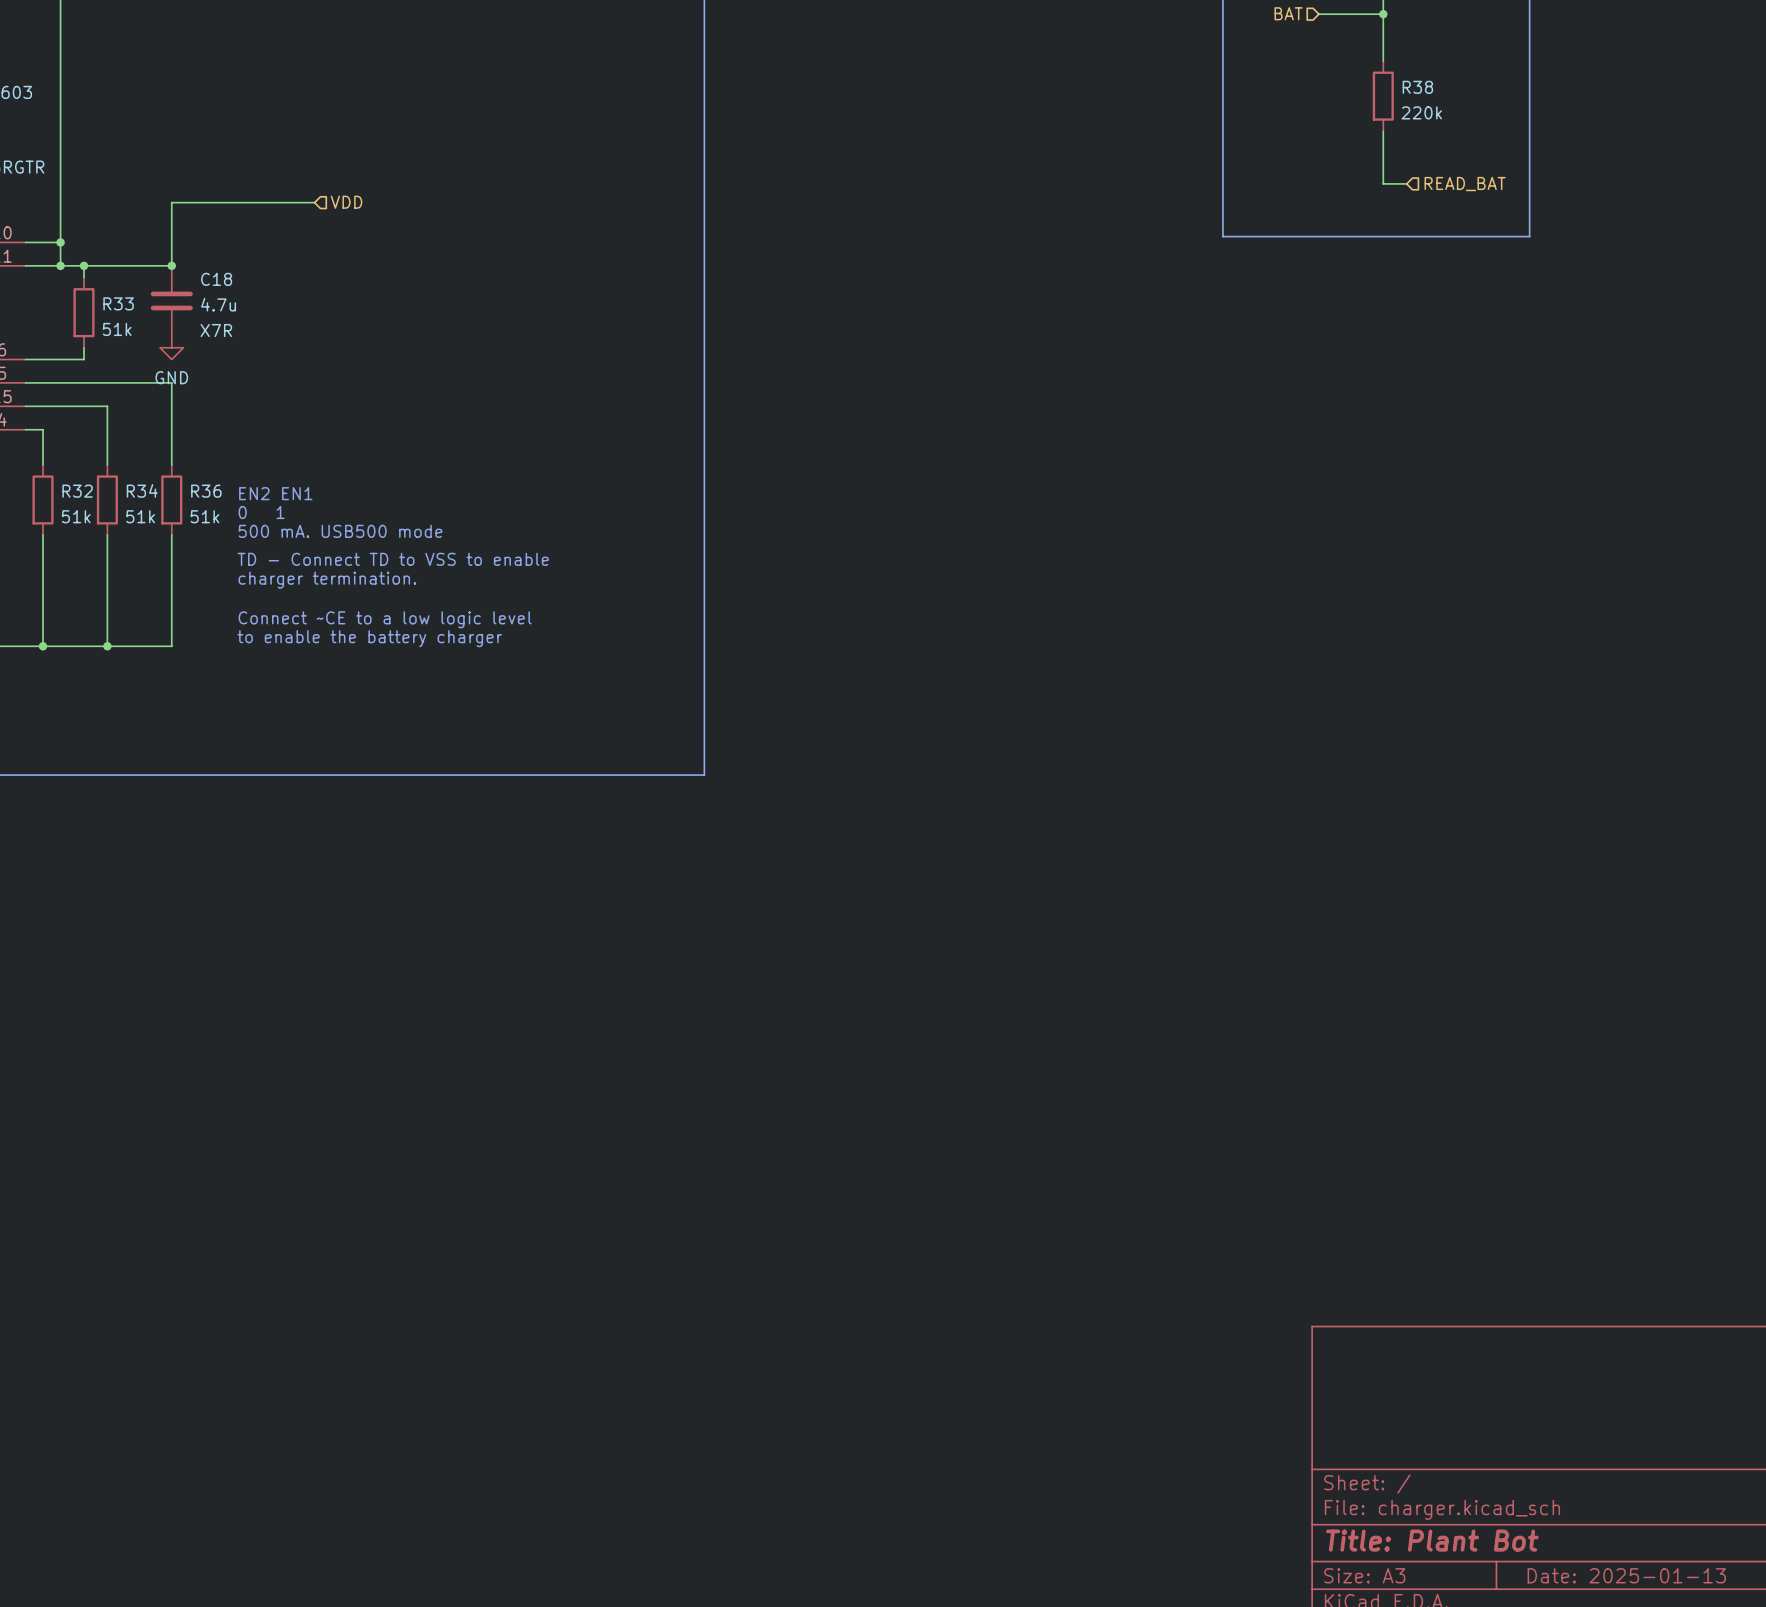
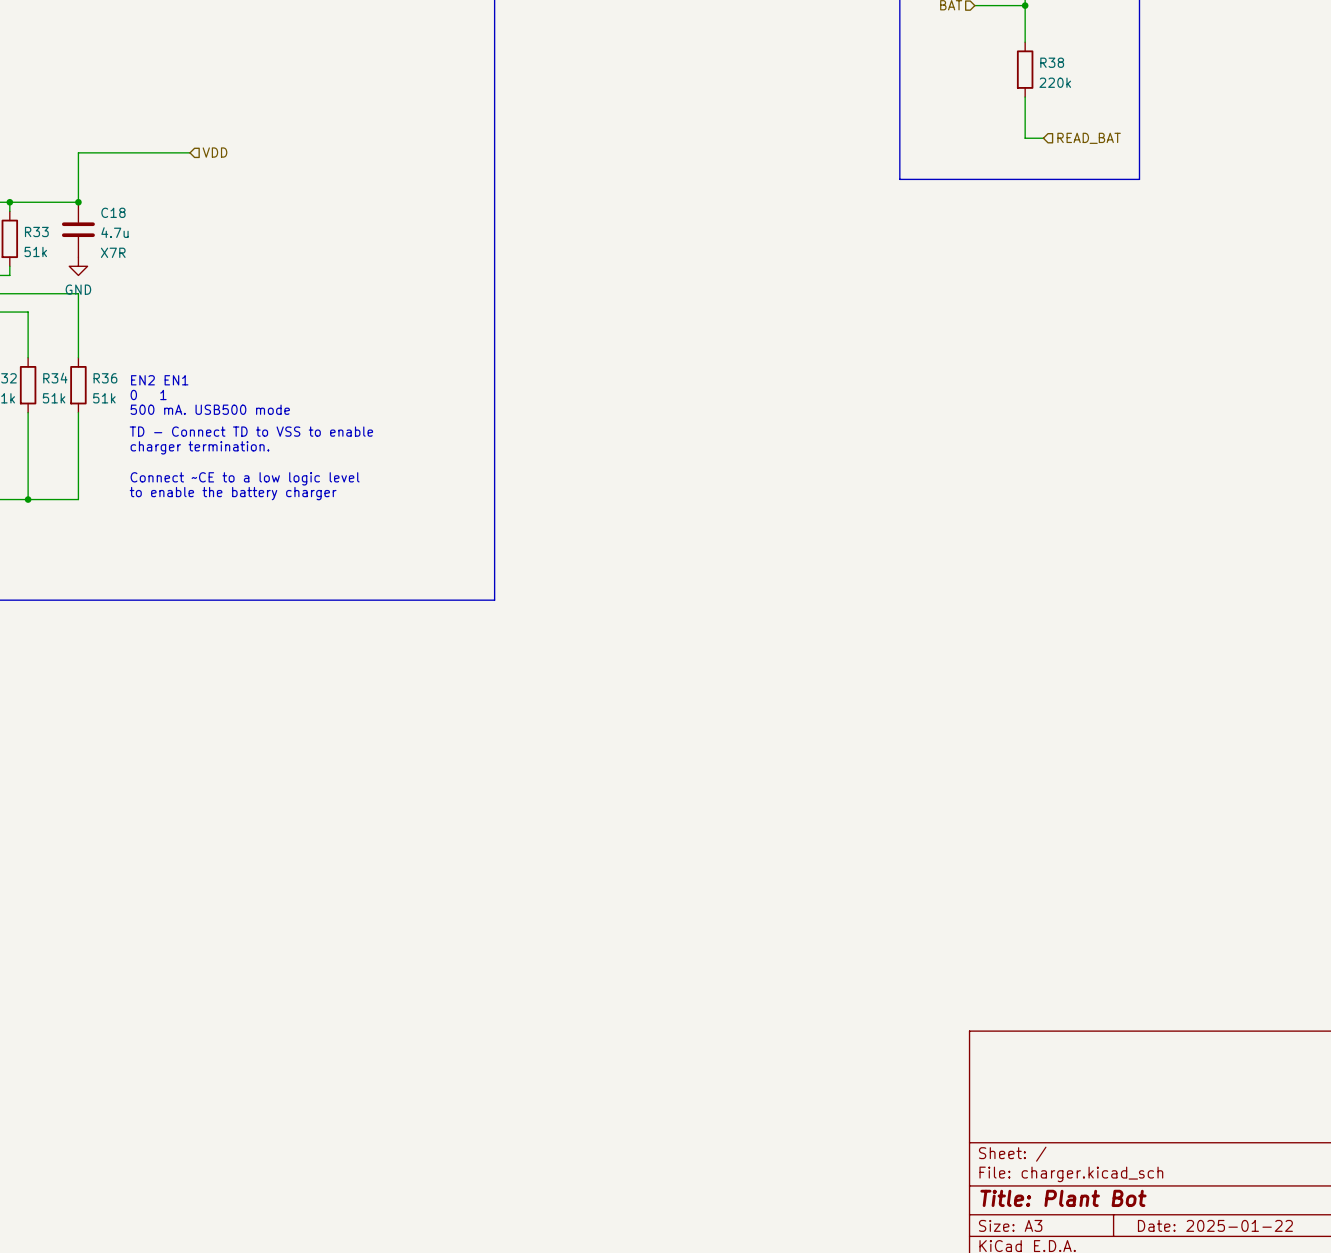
title block: Date: 2025-01-13 (1626, 1575) -> Date: 2025-01-22 (1215, 1225)

